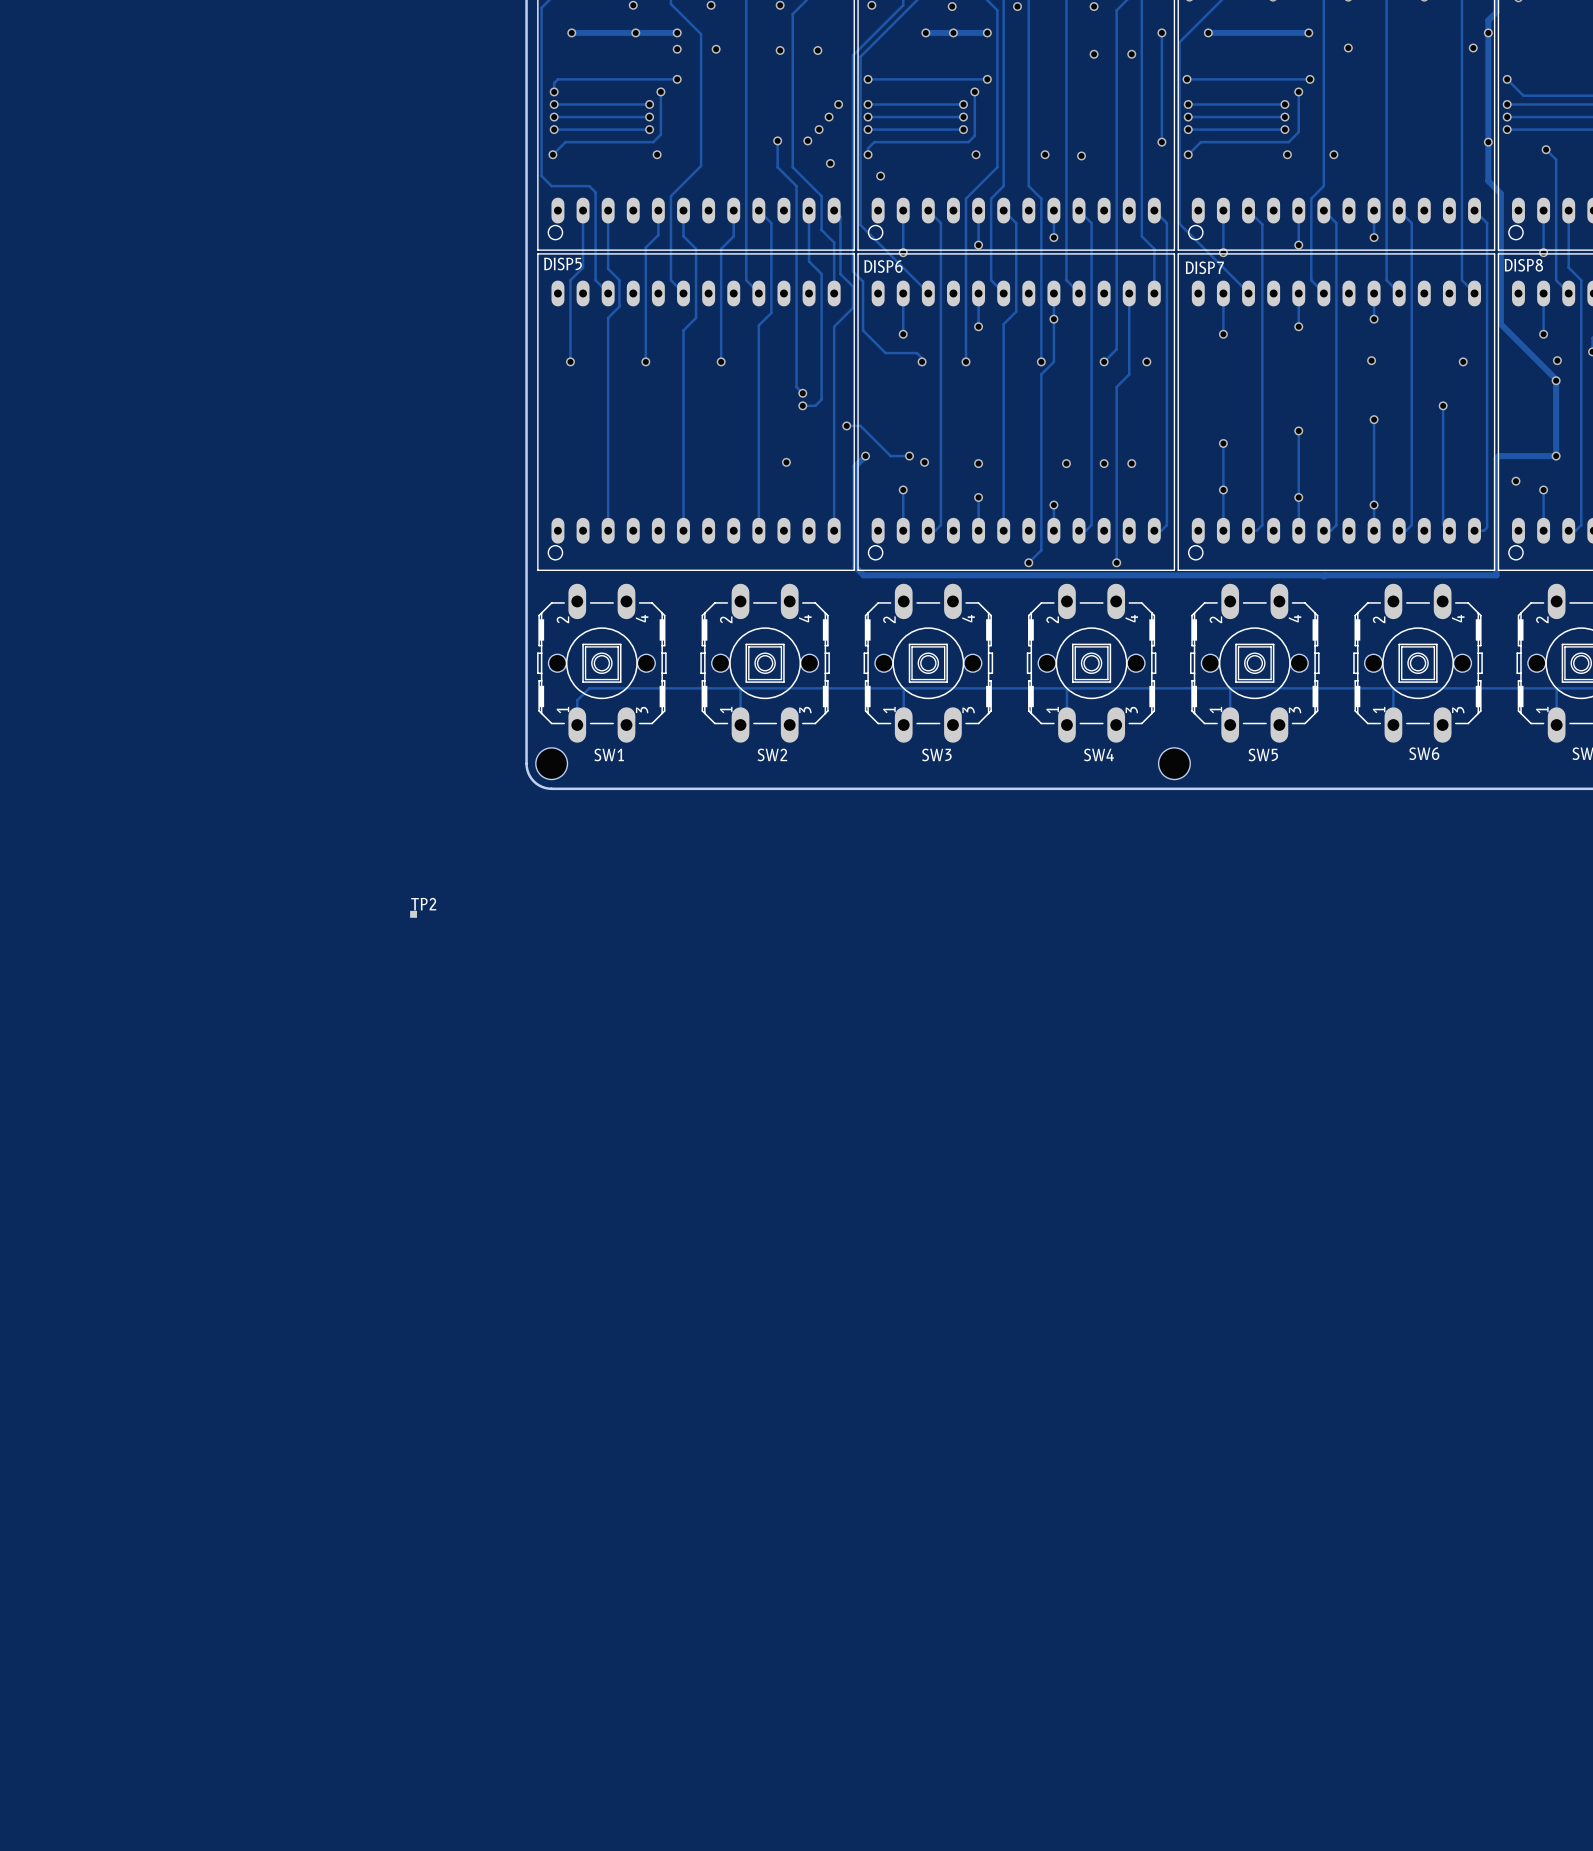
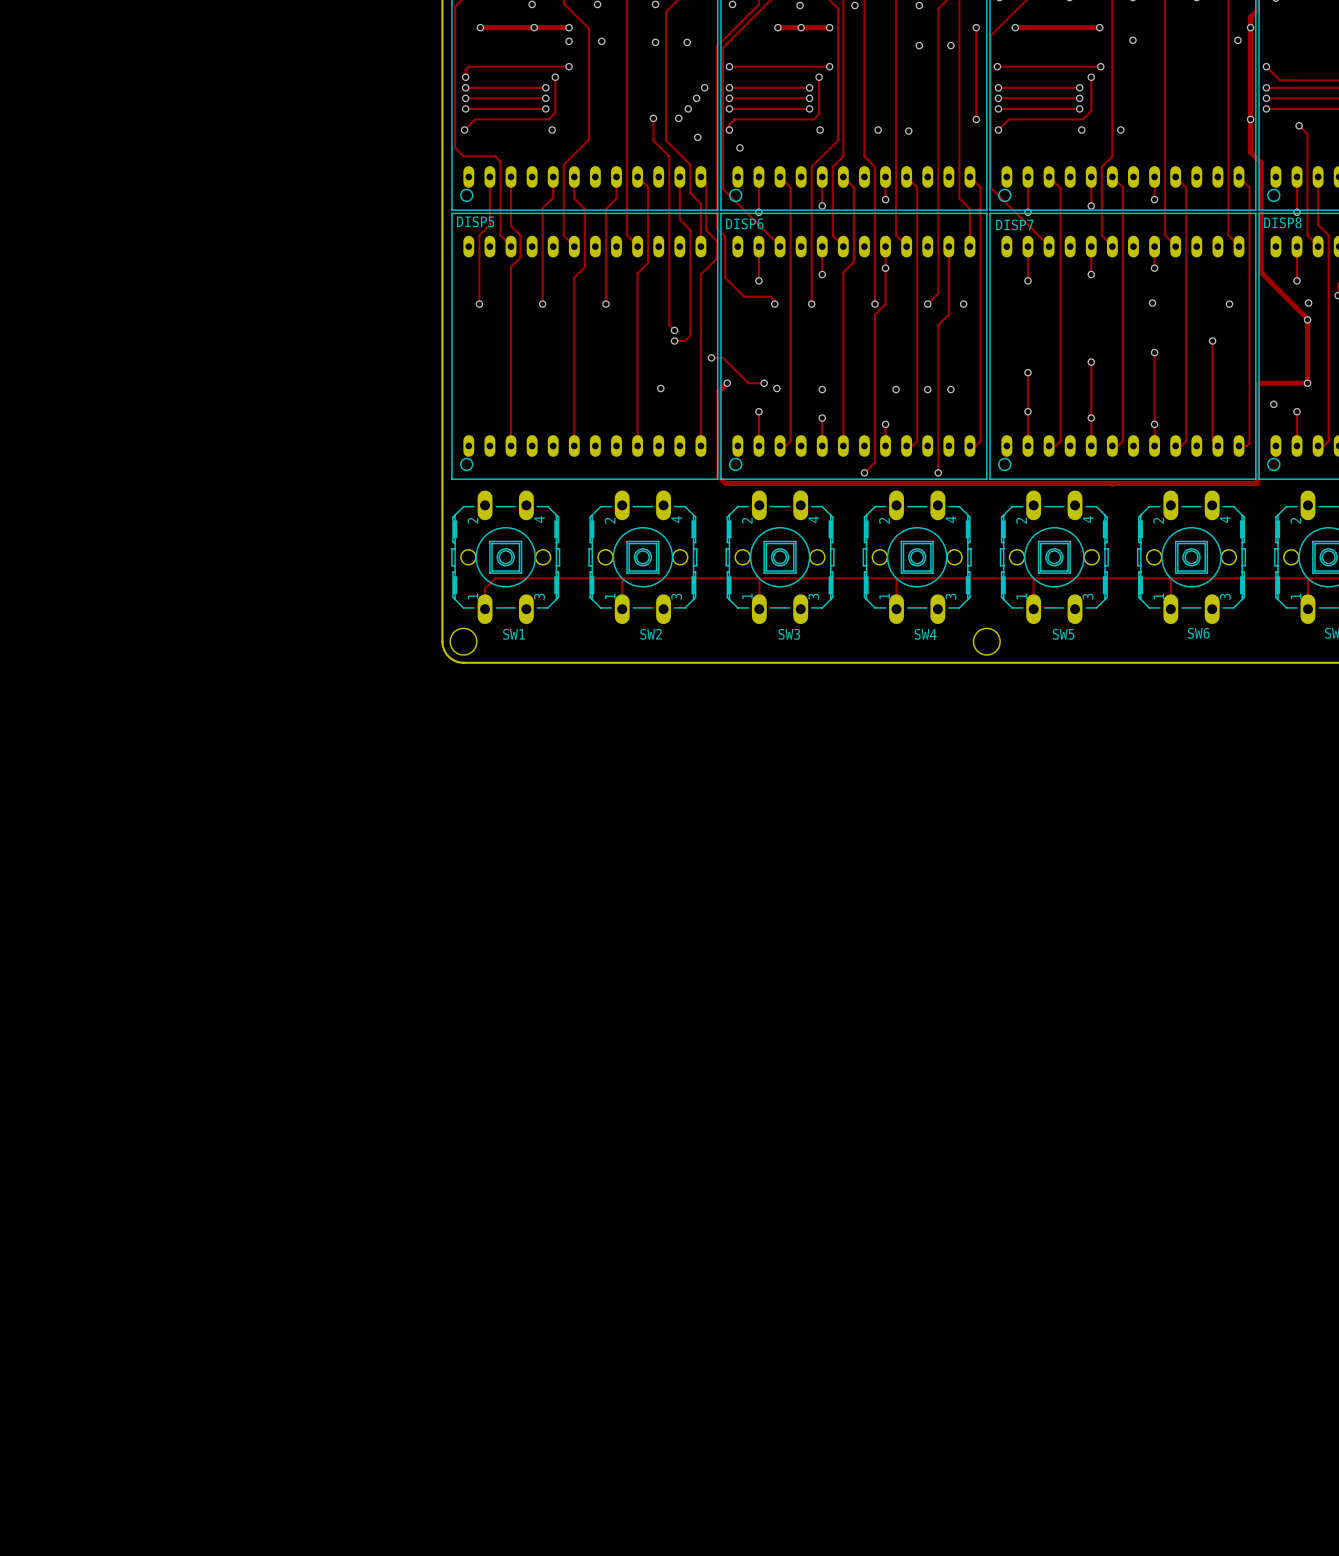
TP2: (413, 914) -> none

